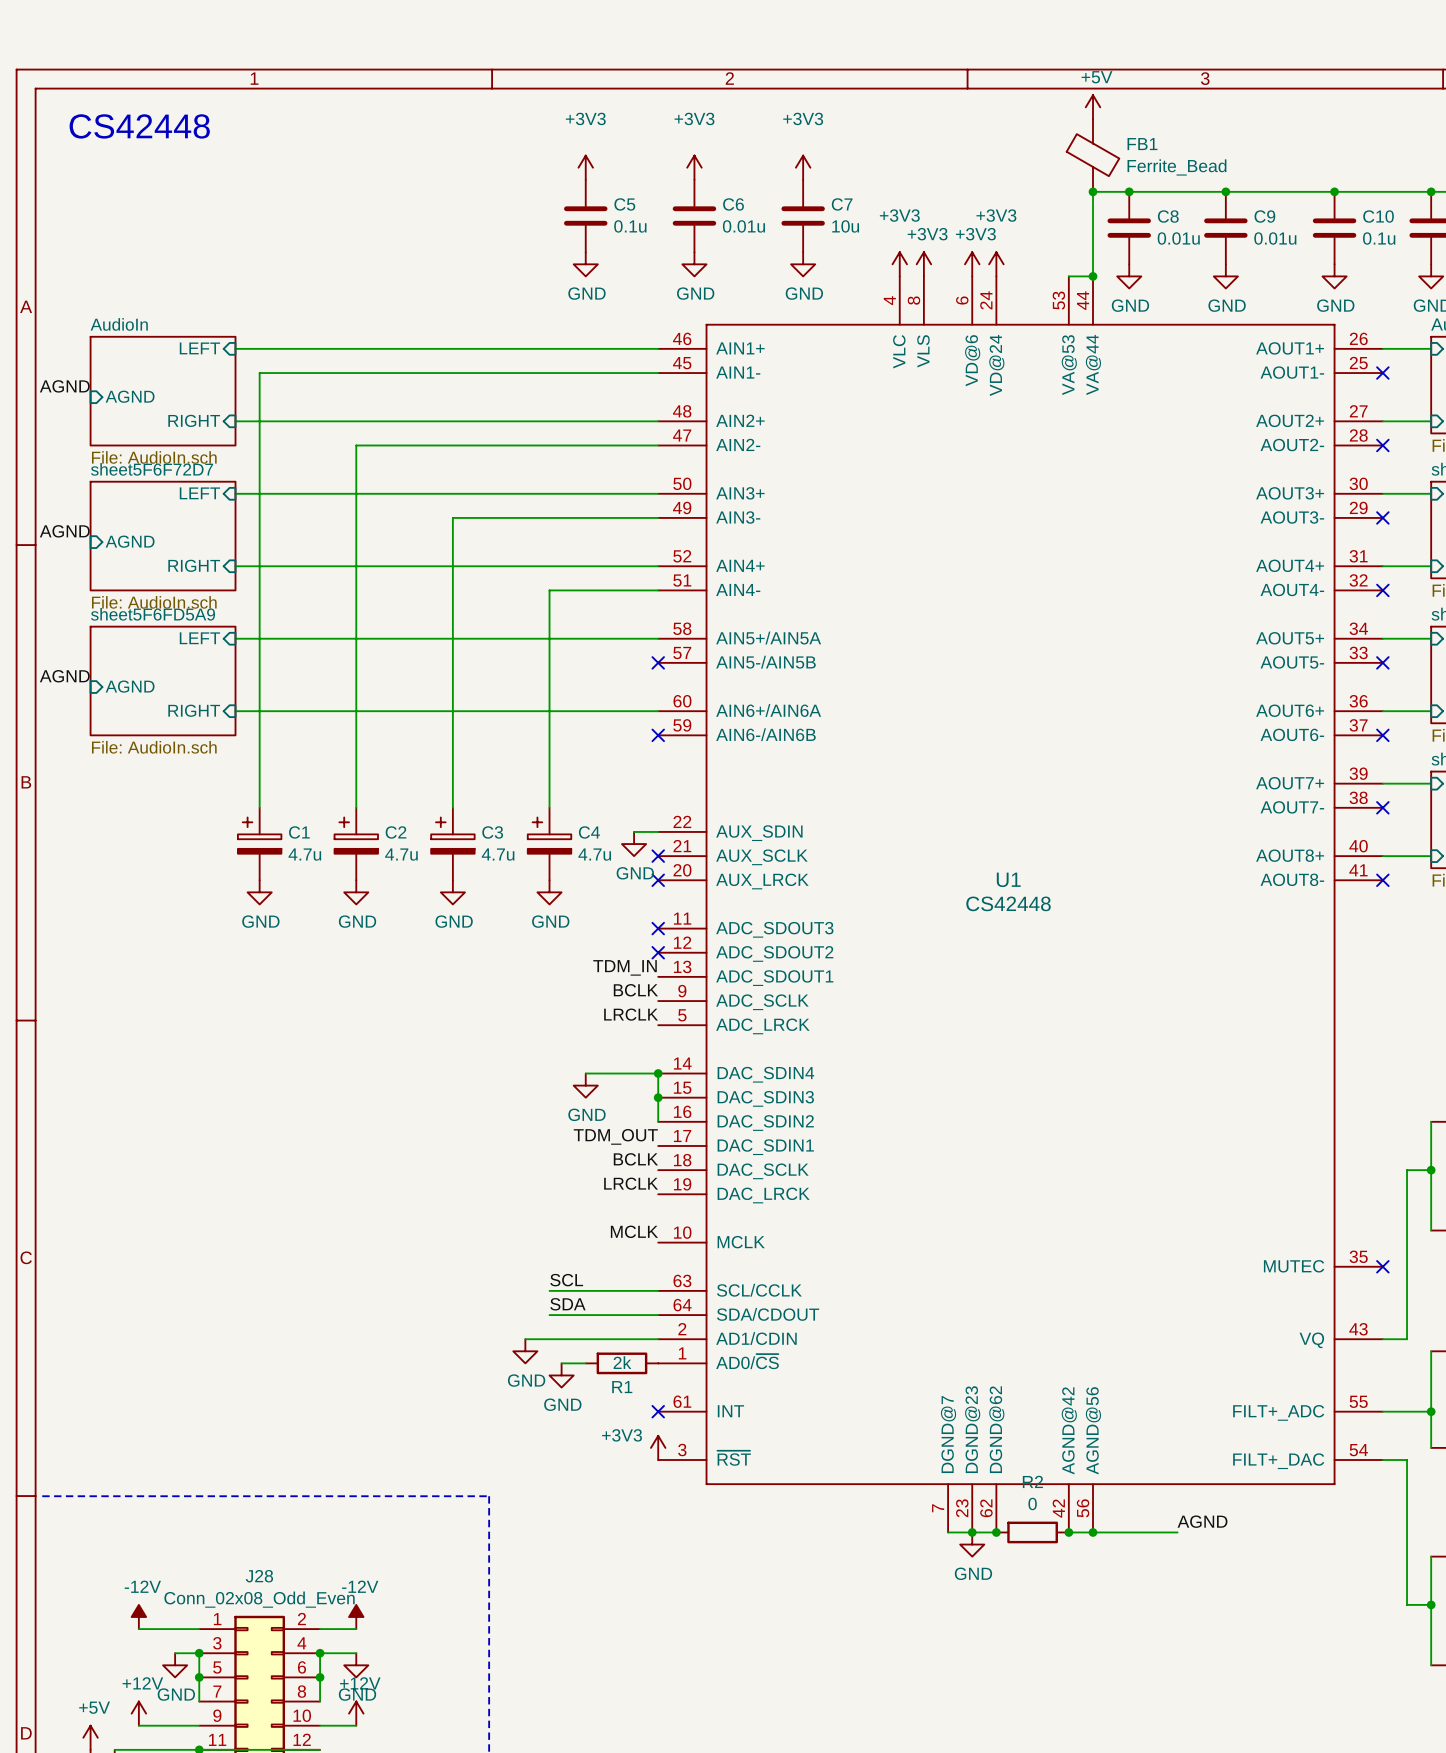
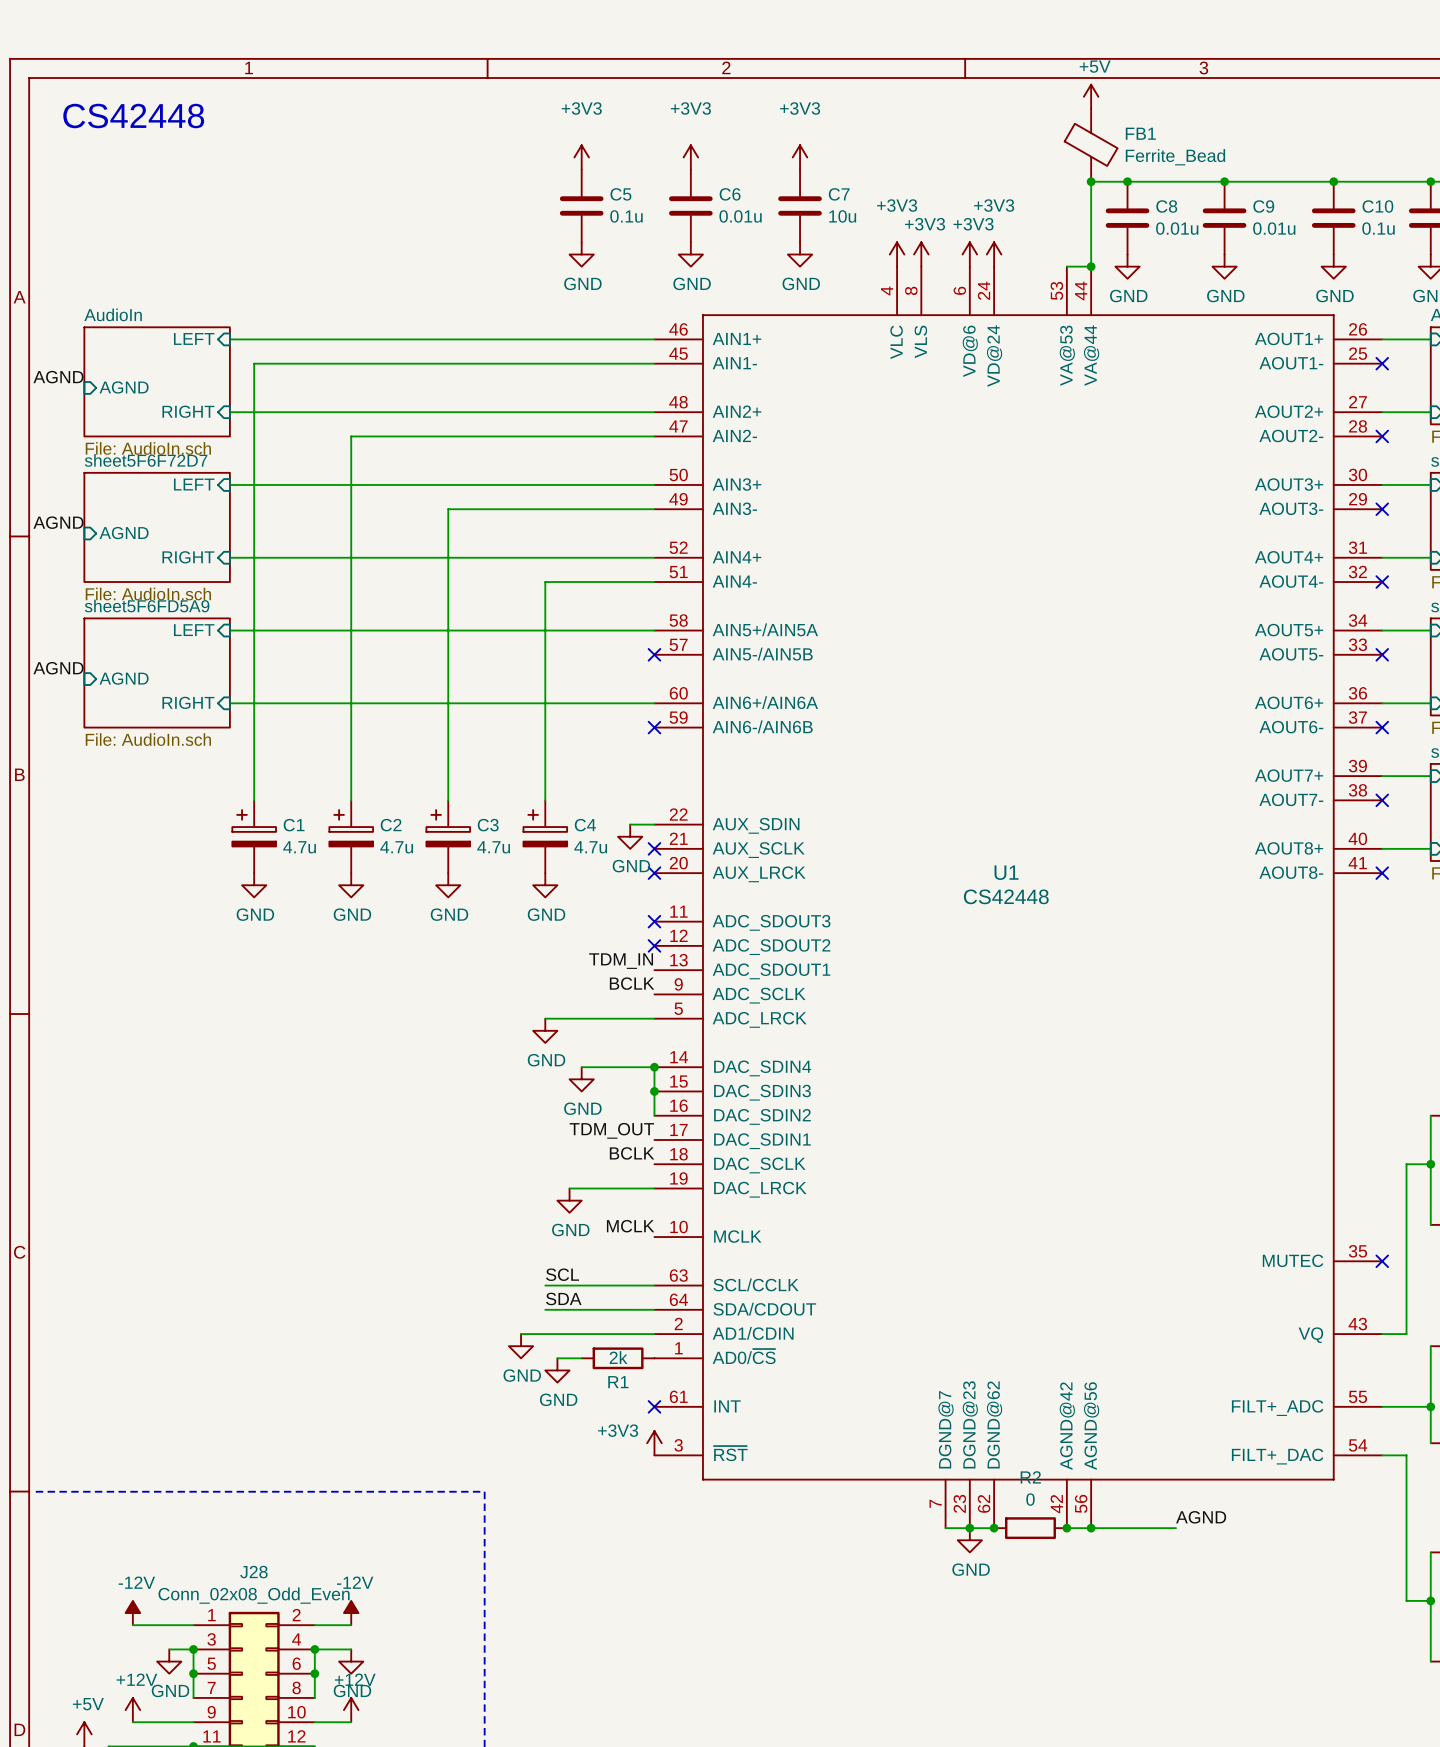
label: LRCLK (631, 1014) -> none
wire: none -> (545, 1018) (654, 1018)
power symbol: none -> GND (545, 1030)
label: LRCLK (631, 1183) -> none
wire: none -> (569, 1188) (654, 1188)
power symbol: none -> GND (569, 1200)

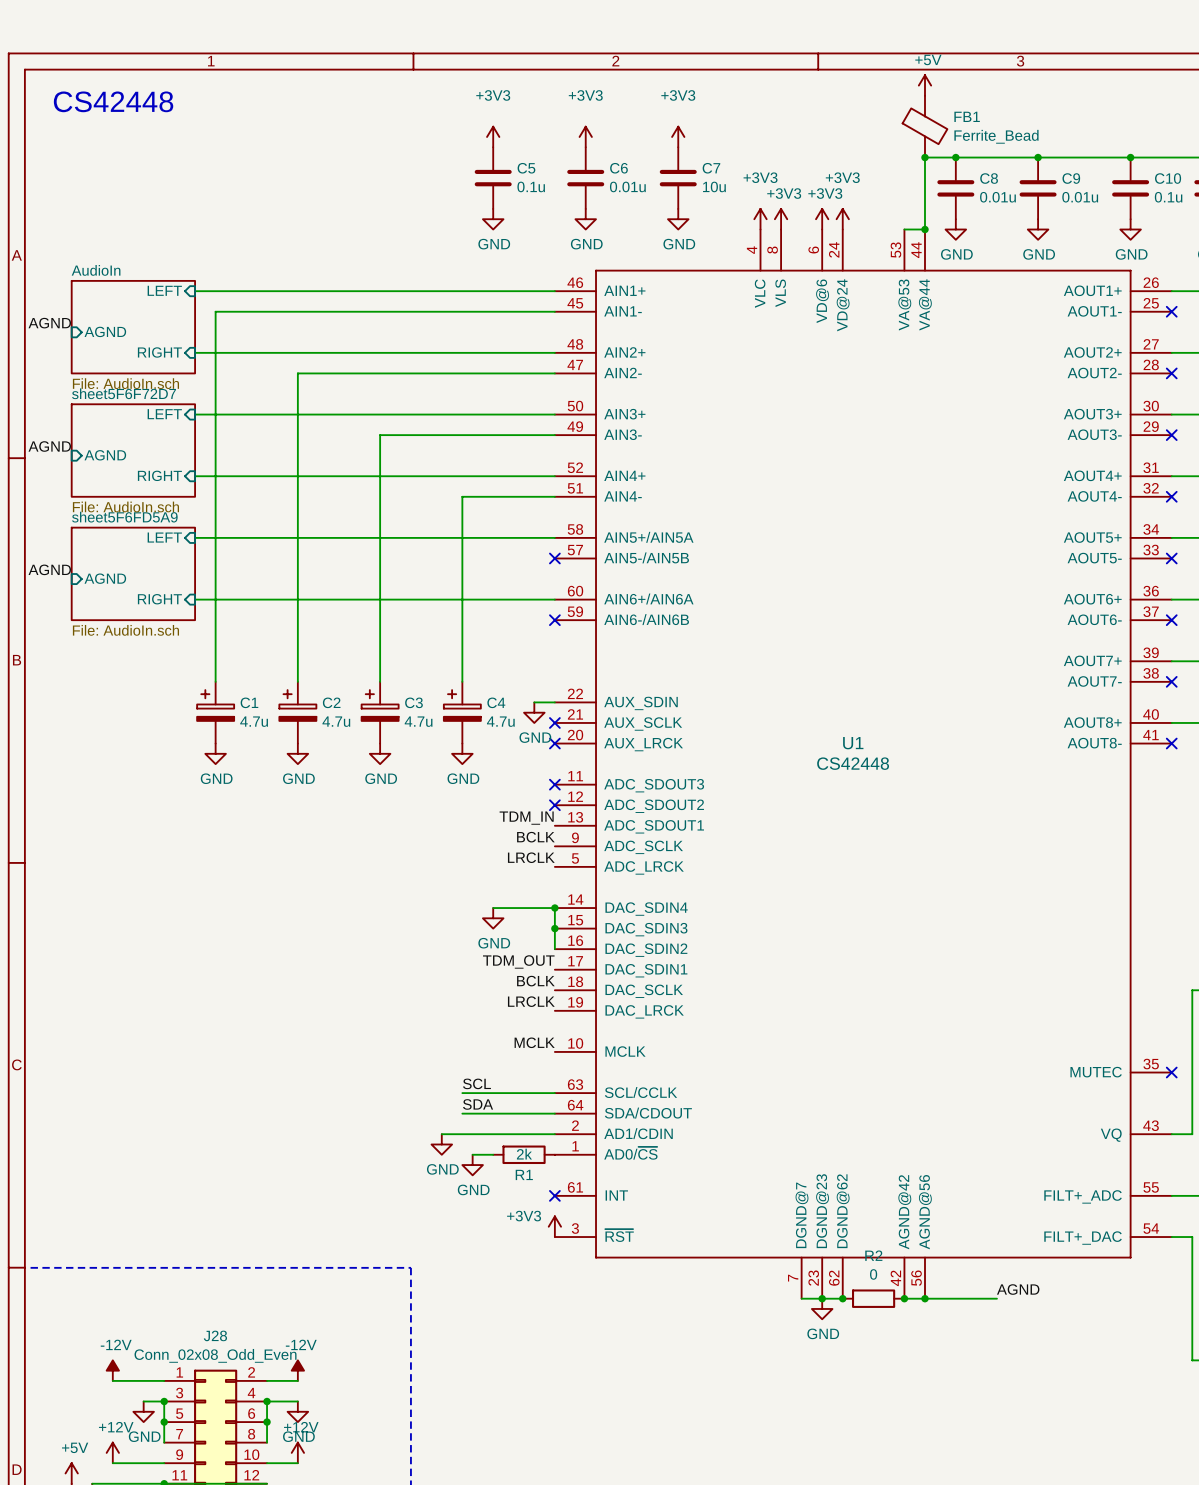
label: none -> LRCLK (531, 857)
wire: (545, 1018) (654, 1018) -> none
power symbol: GND (545, 1030) -> none
label: none -> LRCLK (531, 1001)
wire: (569, 1188) (654, 1188) -> none
power symbol: GND (569, 1200) -> none

